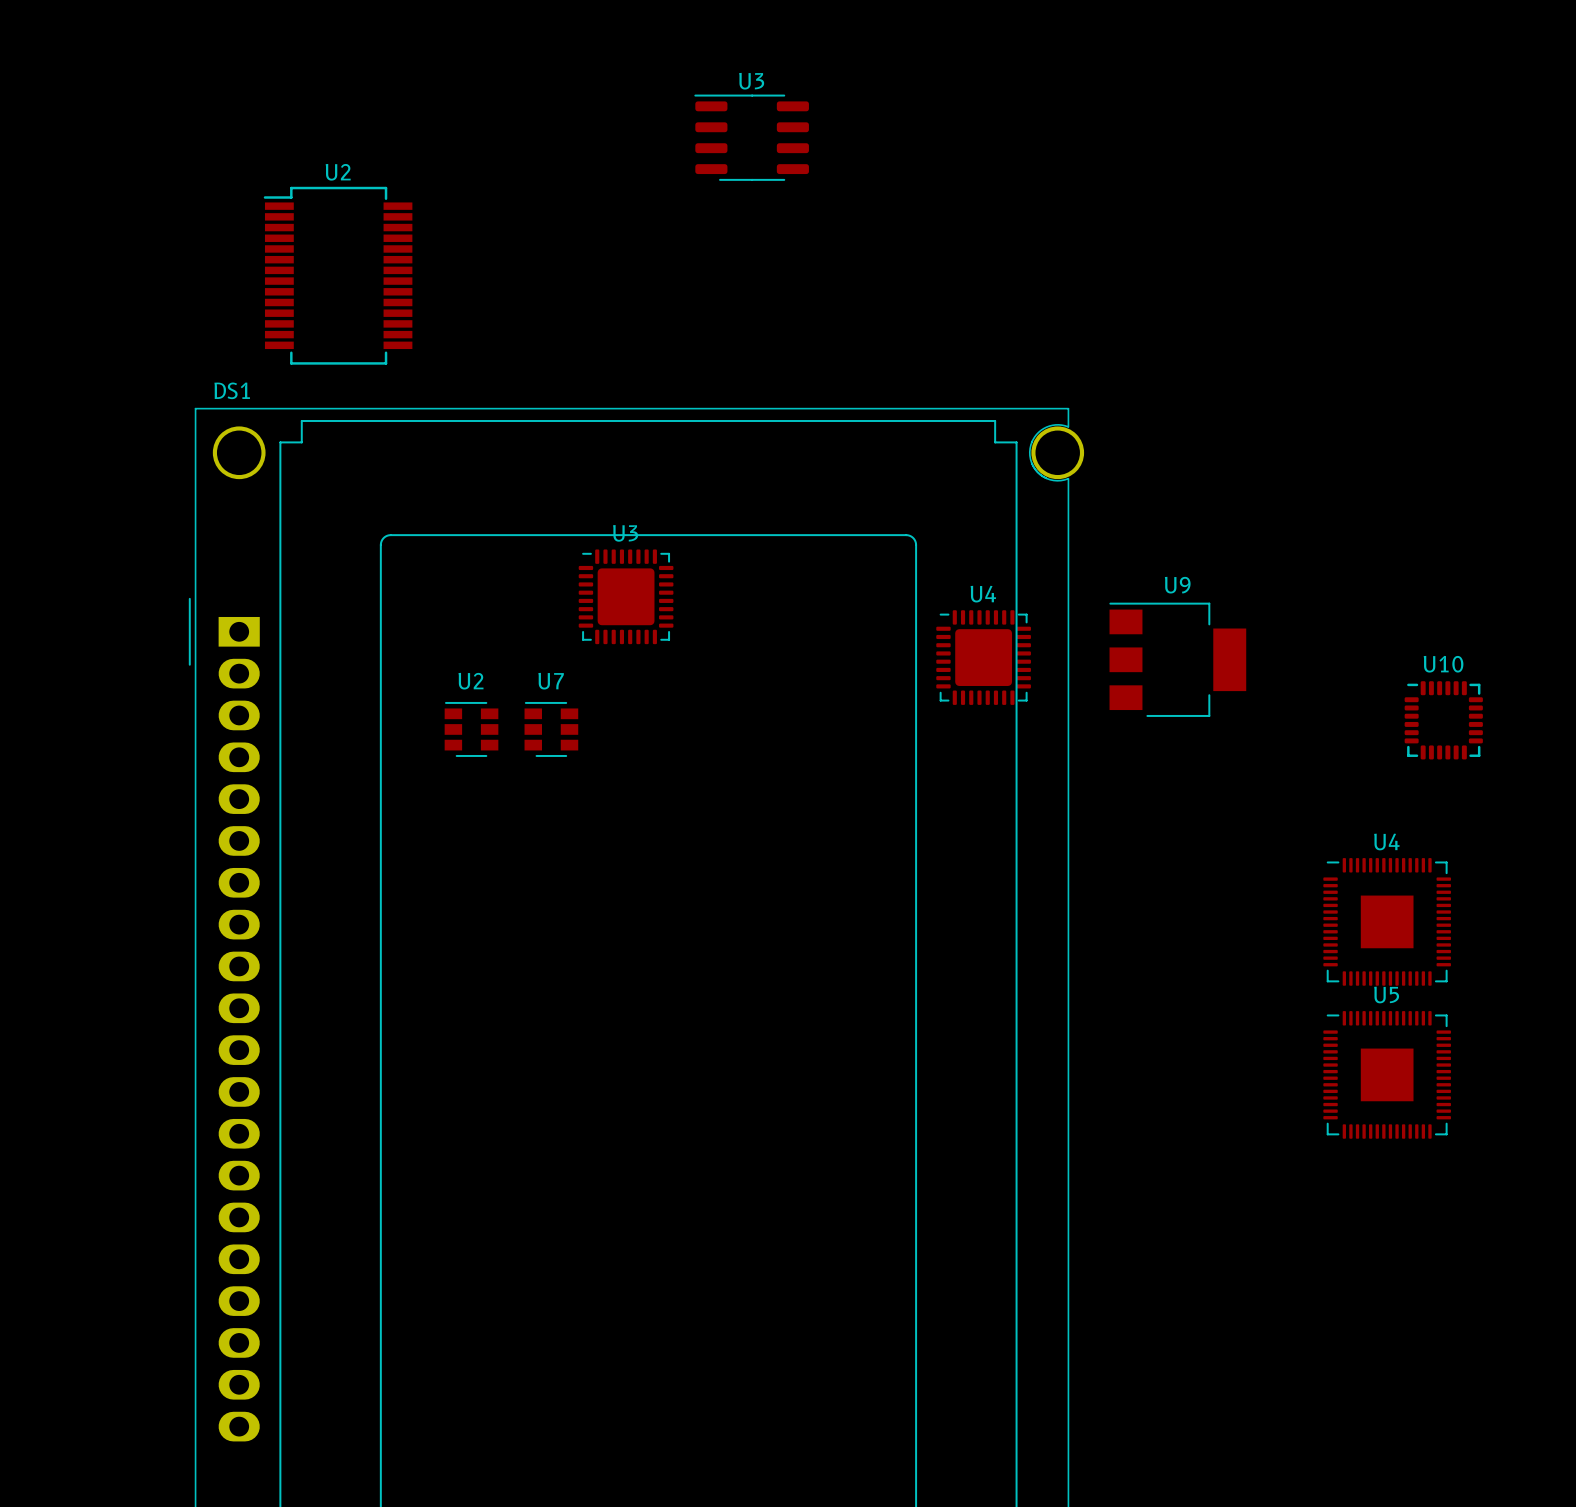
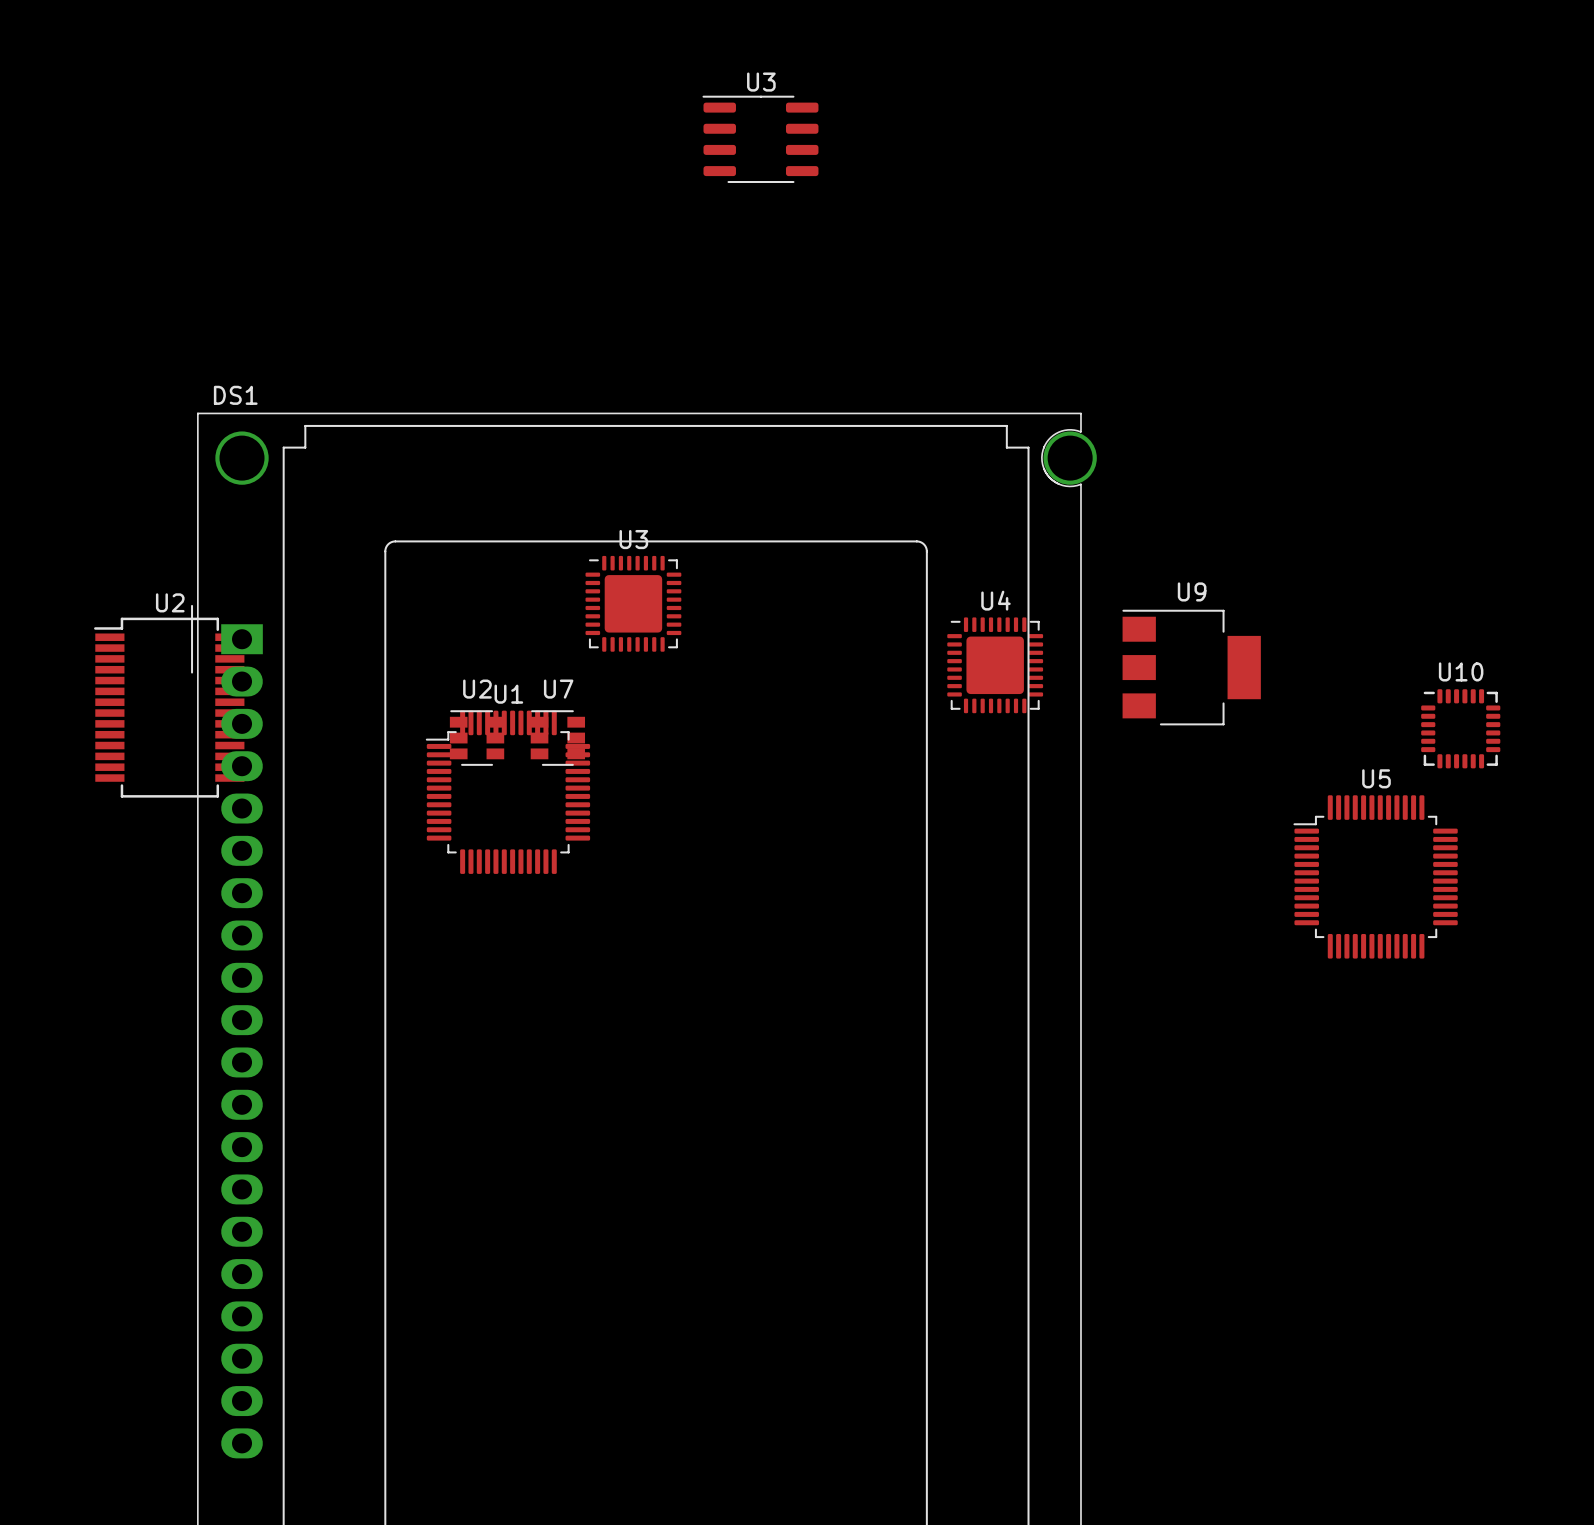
U2: (338, 275) -> none
U2: none -> (169, 707)
U1: none -> (507, 792)
U4: (1387, 921) -> none
U5 footprint: [1323, 1011, 1451, 1139] -> [1293, 795, 1458, 959]

